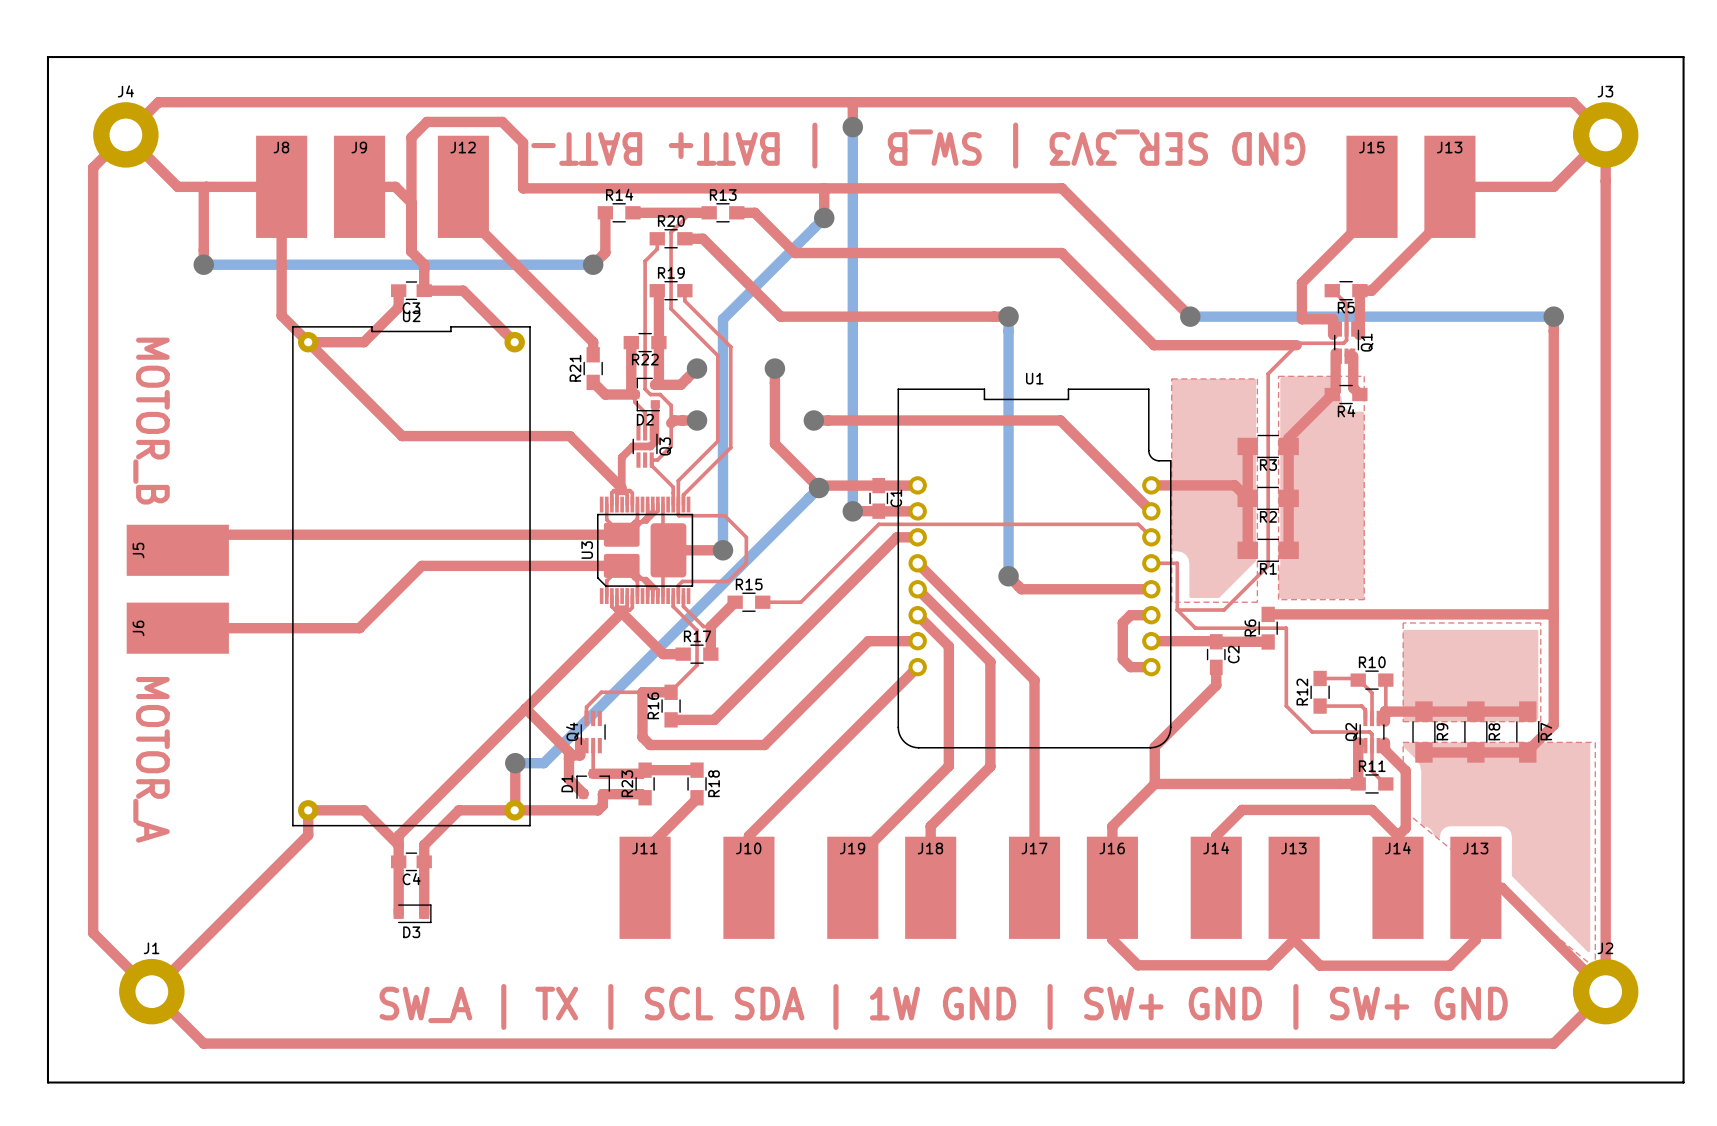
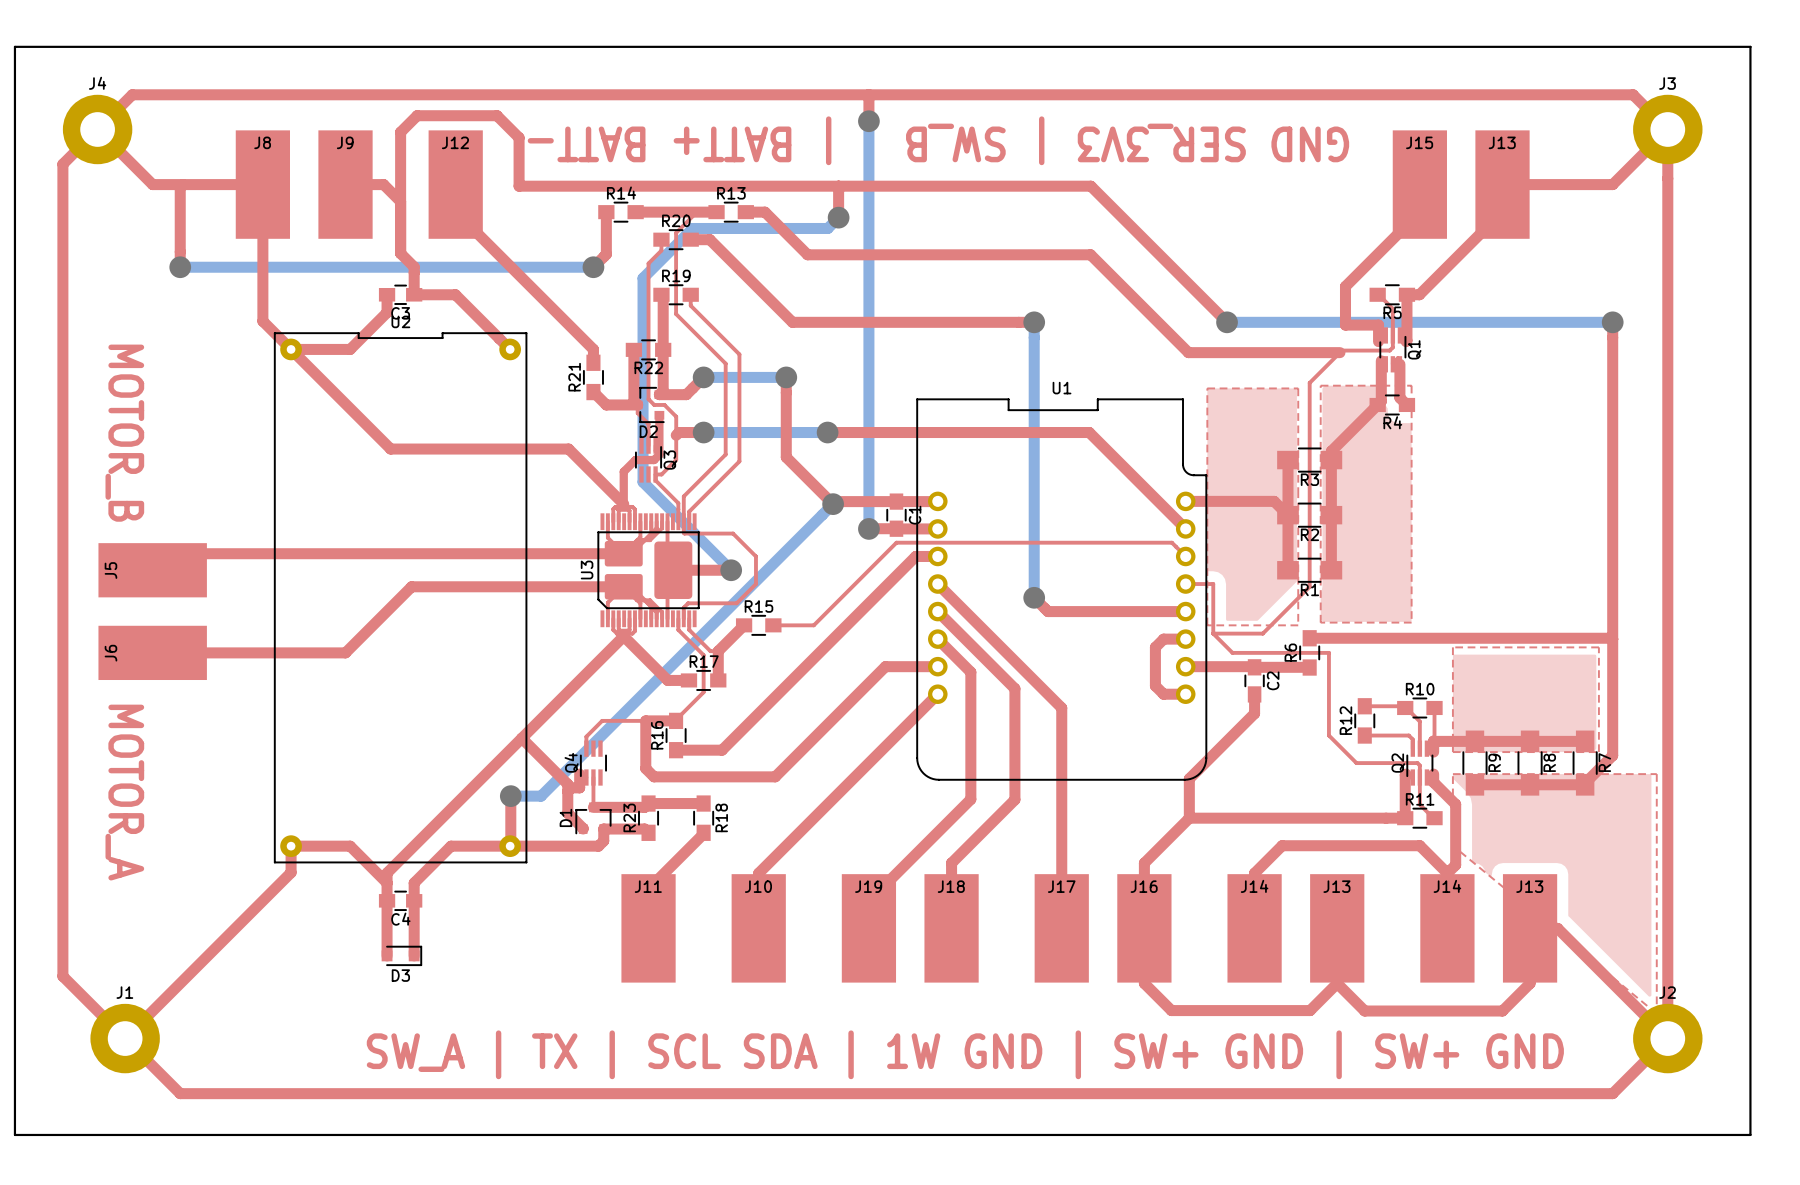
bottom track: (814, 228) (722, 319) (722, 550) -> (827, 228) (692, 228) (643, 278) (643, 482) (731, 570)
bottom track: none -> (703, 377) (786, 377)
bottom track: none -> (703, 432) (827, 432)

